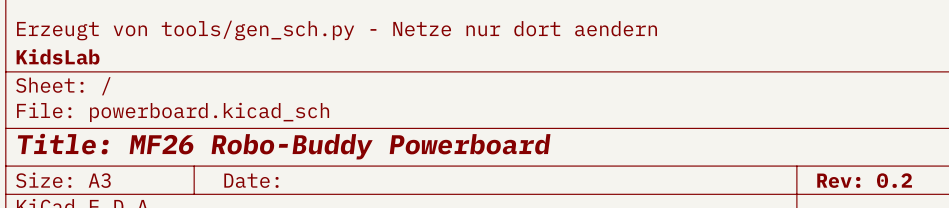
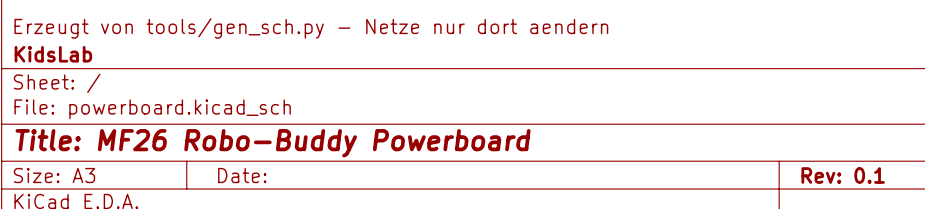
title block: Rev: 0.2 (864, 180) -> Rev: 0.1 (843, 175)

